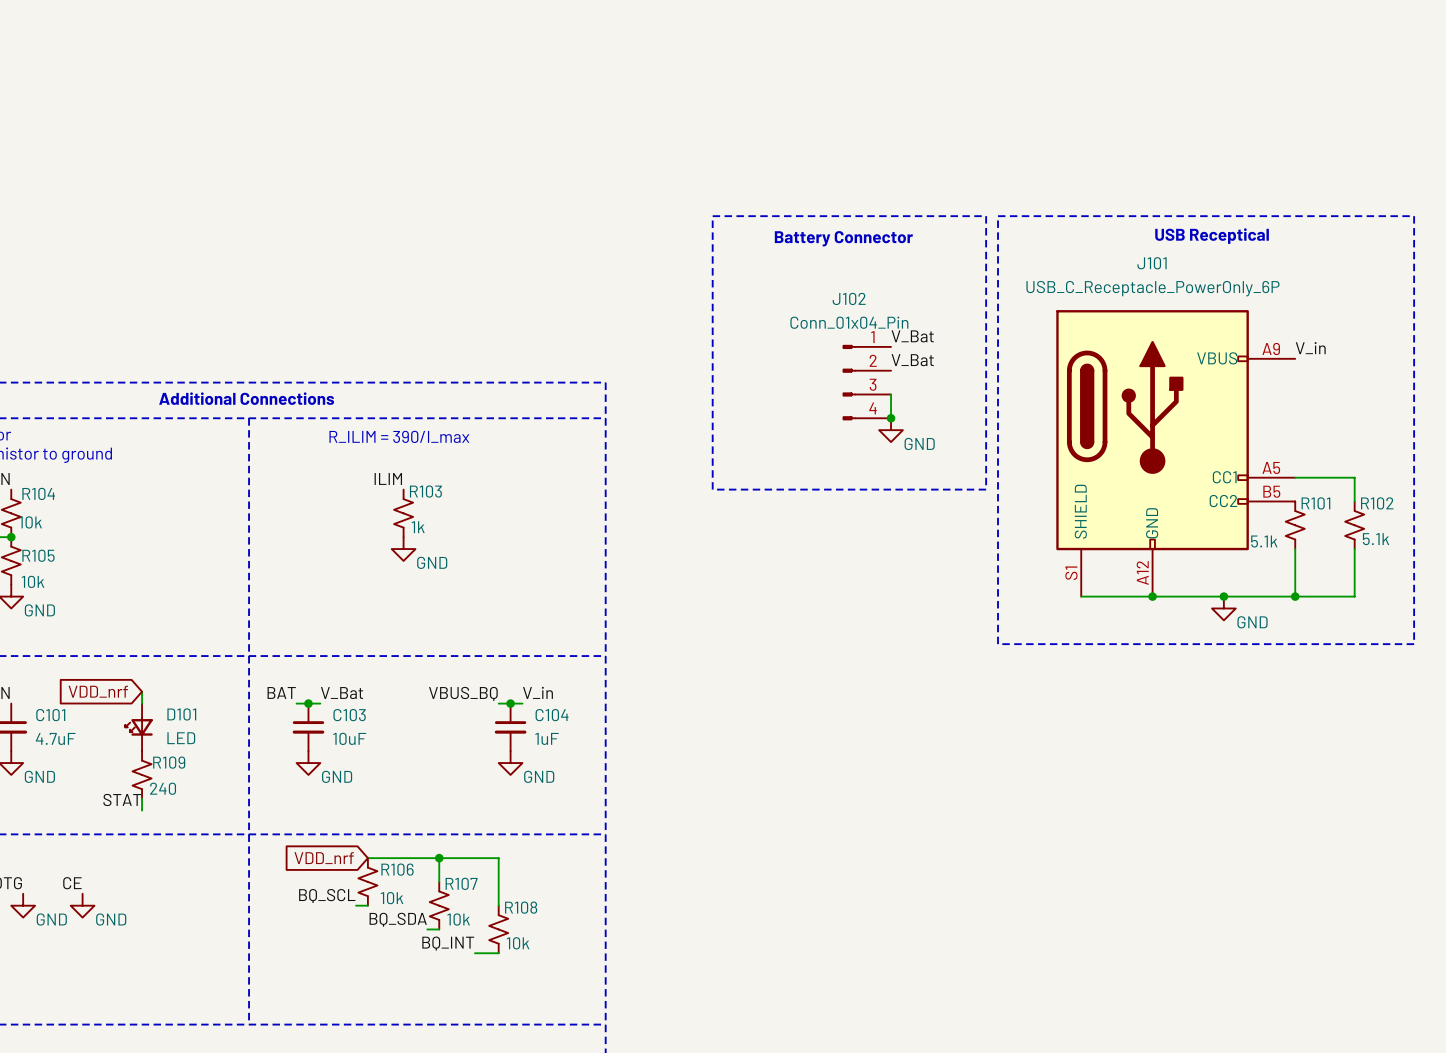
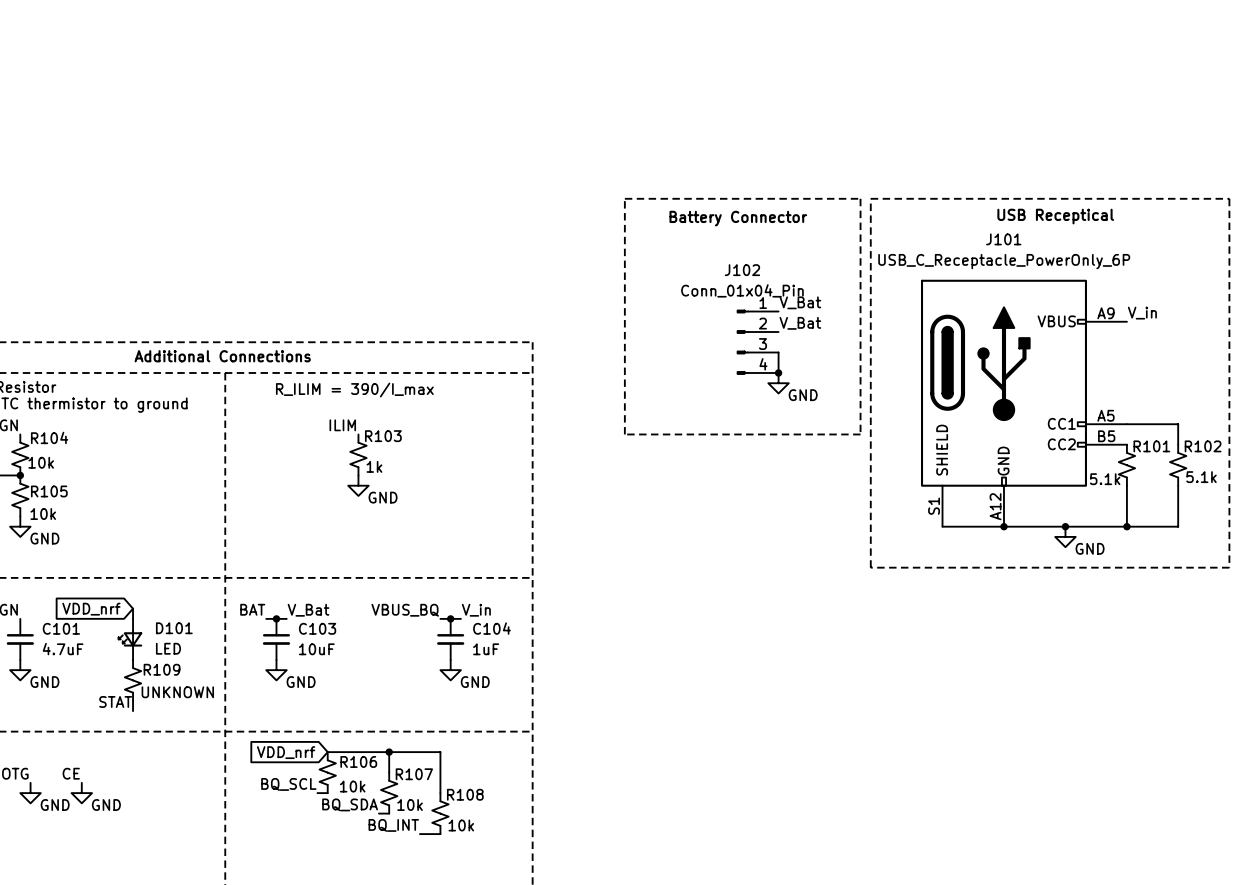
R109 value: 240 (163, 788) -> UNKNOWN (177, 692)

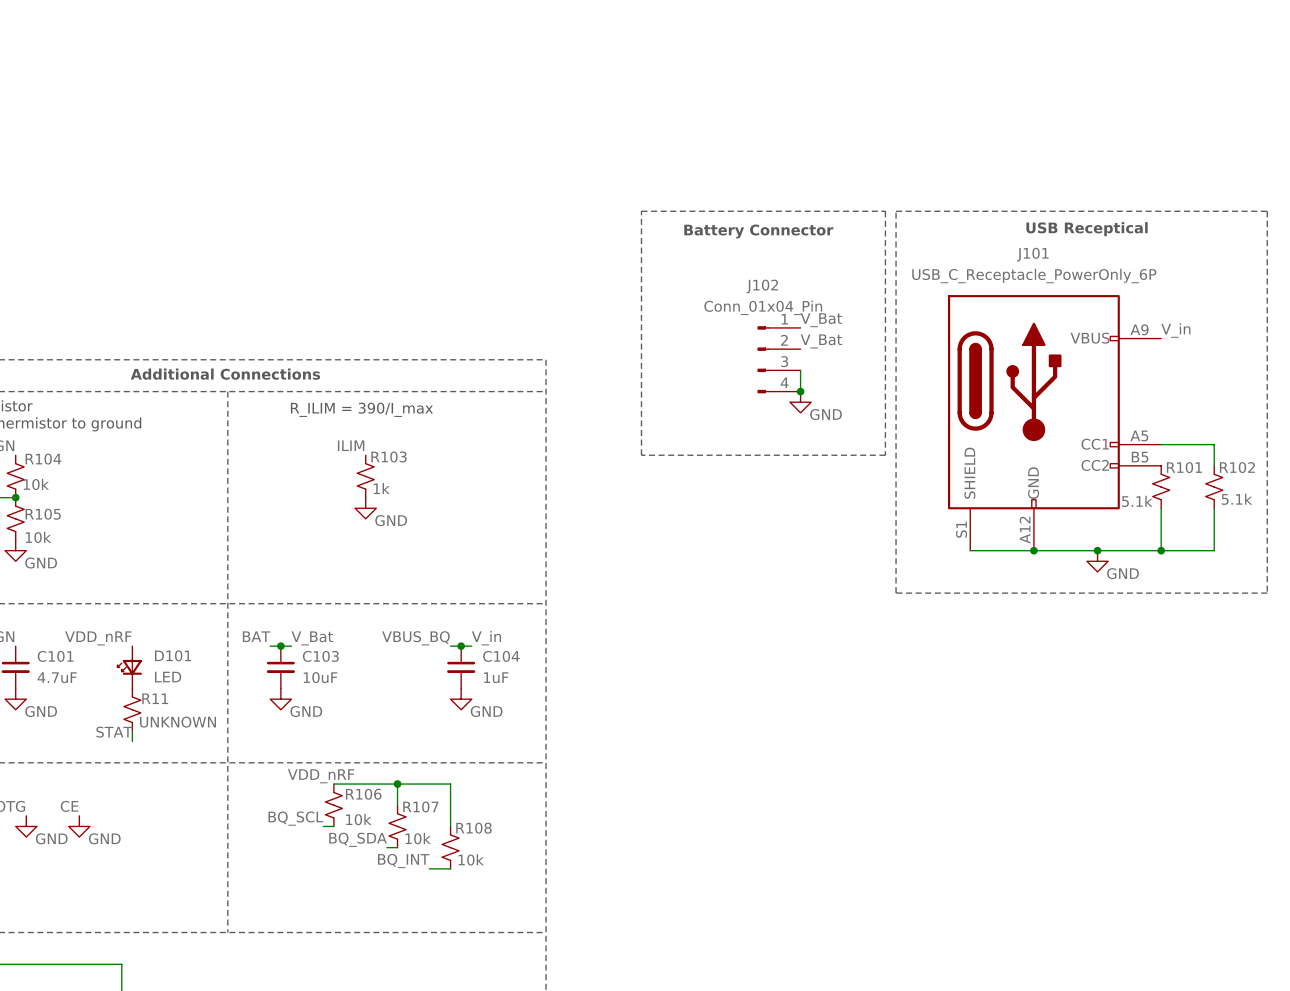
wire: (133, 608) (133, 618) -> none
global label: VDD_nrf (91, 609) -> none
label: none -> VDD_nRF (98, 638)
R109 name: R109 (162, 669) -> R11 (155, 698)
label: none -> VDD_nRF (321, 776)
global label: VDD_nrf (286, 752) -> none

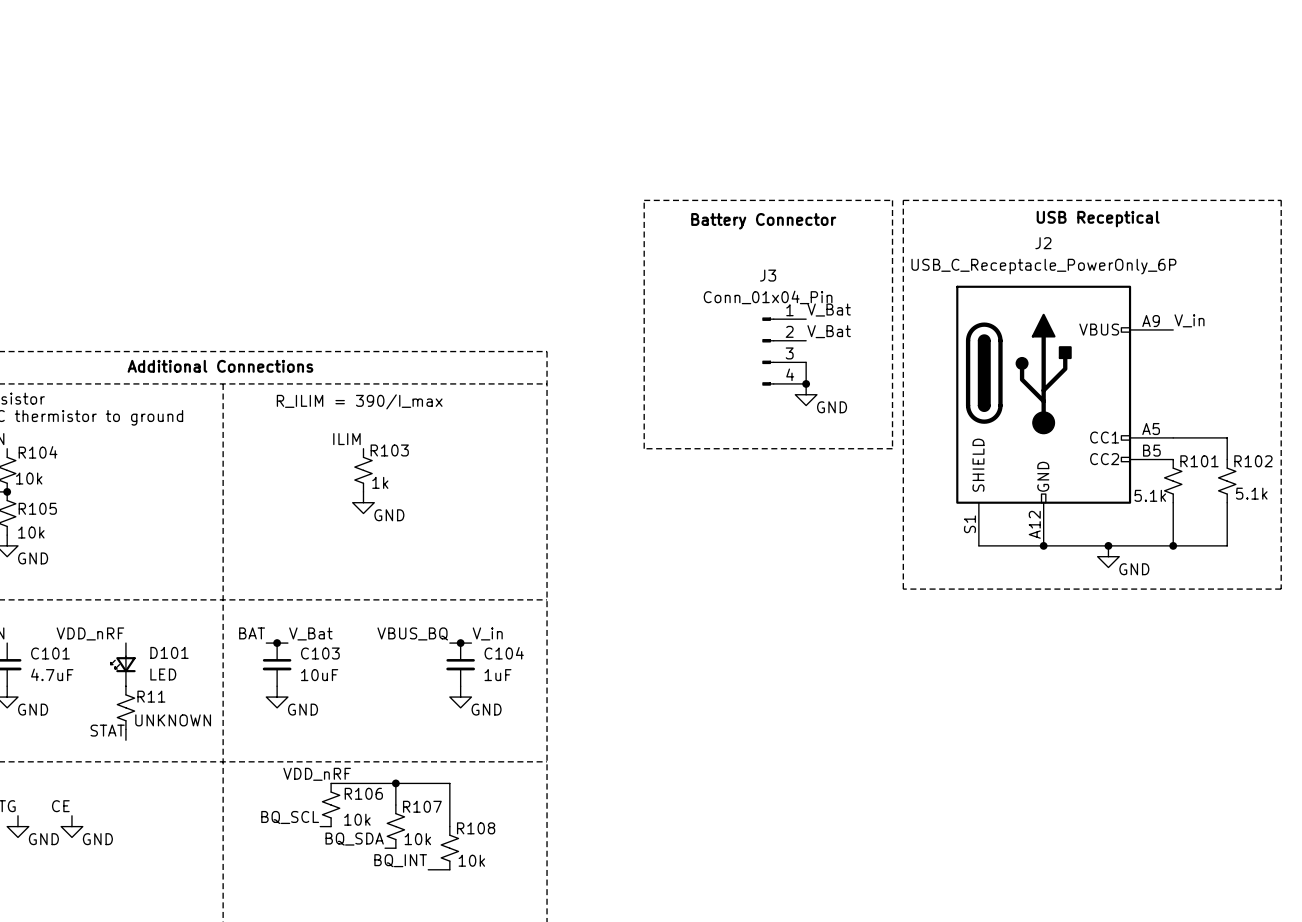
J101 name: J101 (1032, 254) -> J2 (1043, 243)
J102 name: J102 (762, 286) -> J3 (768, 275)

